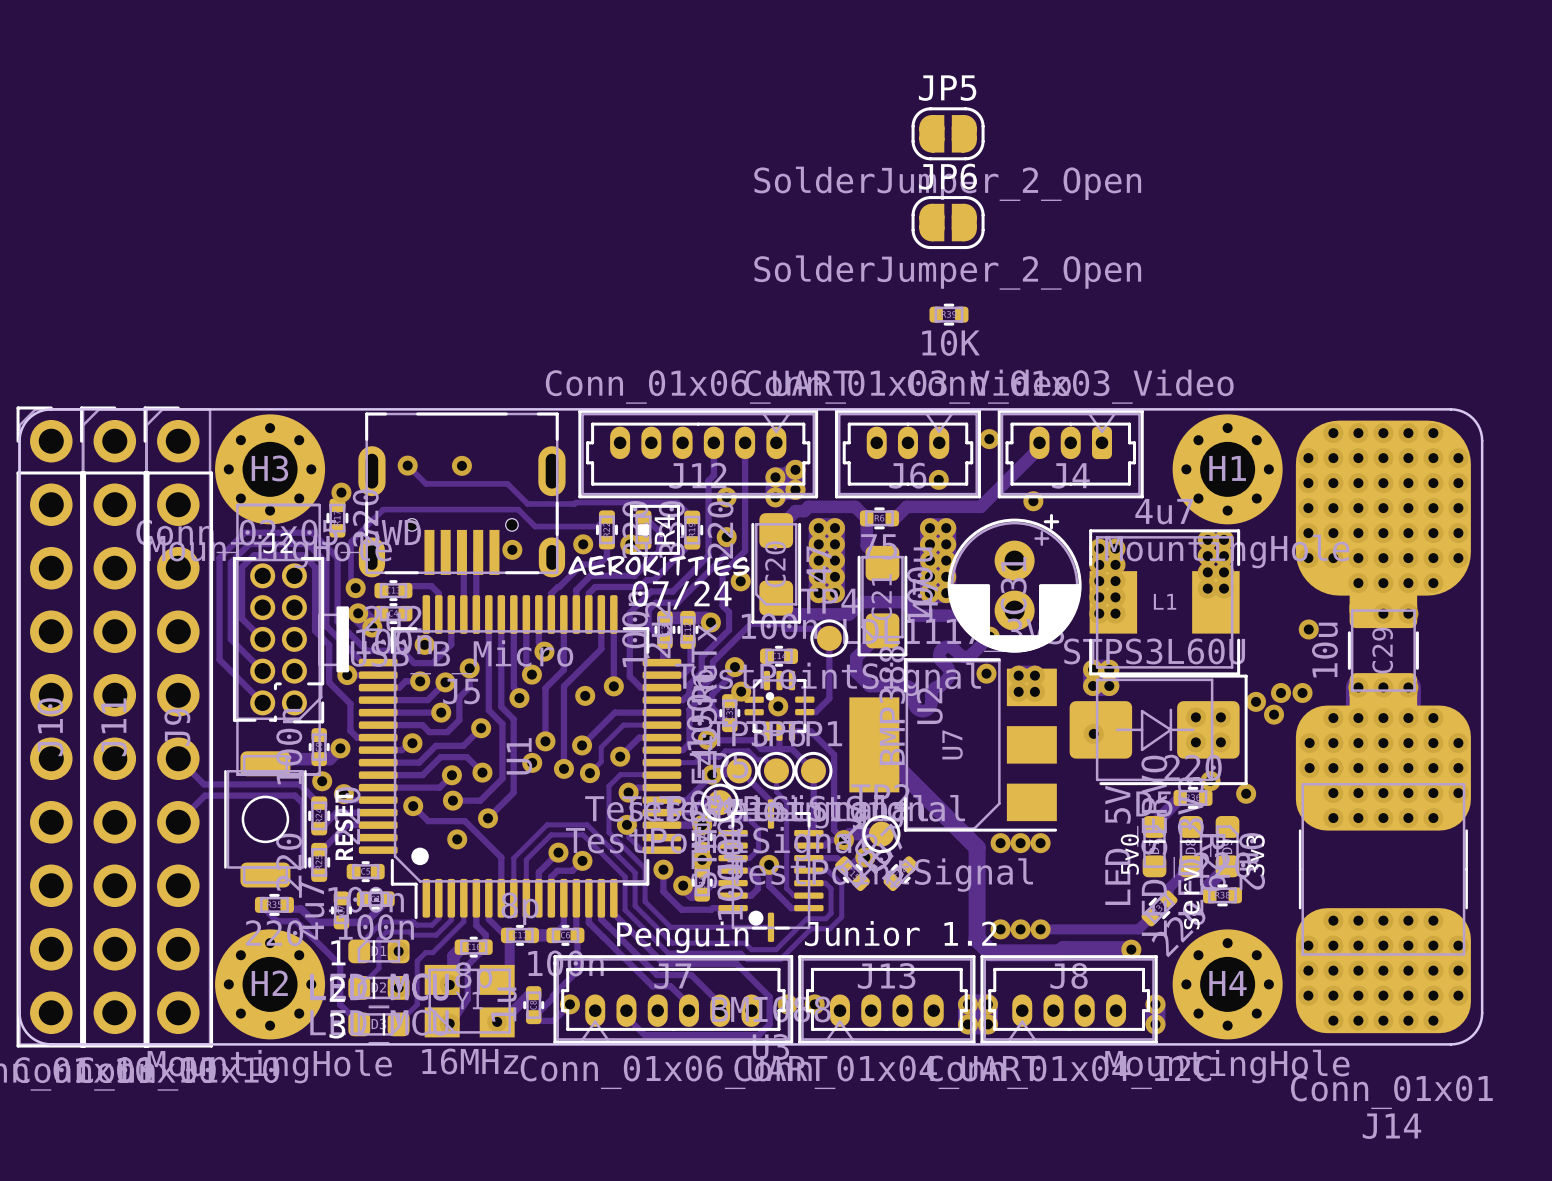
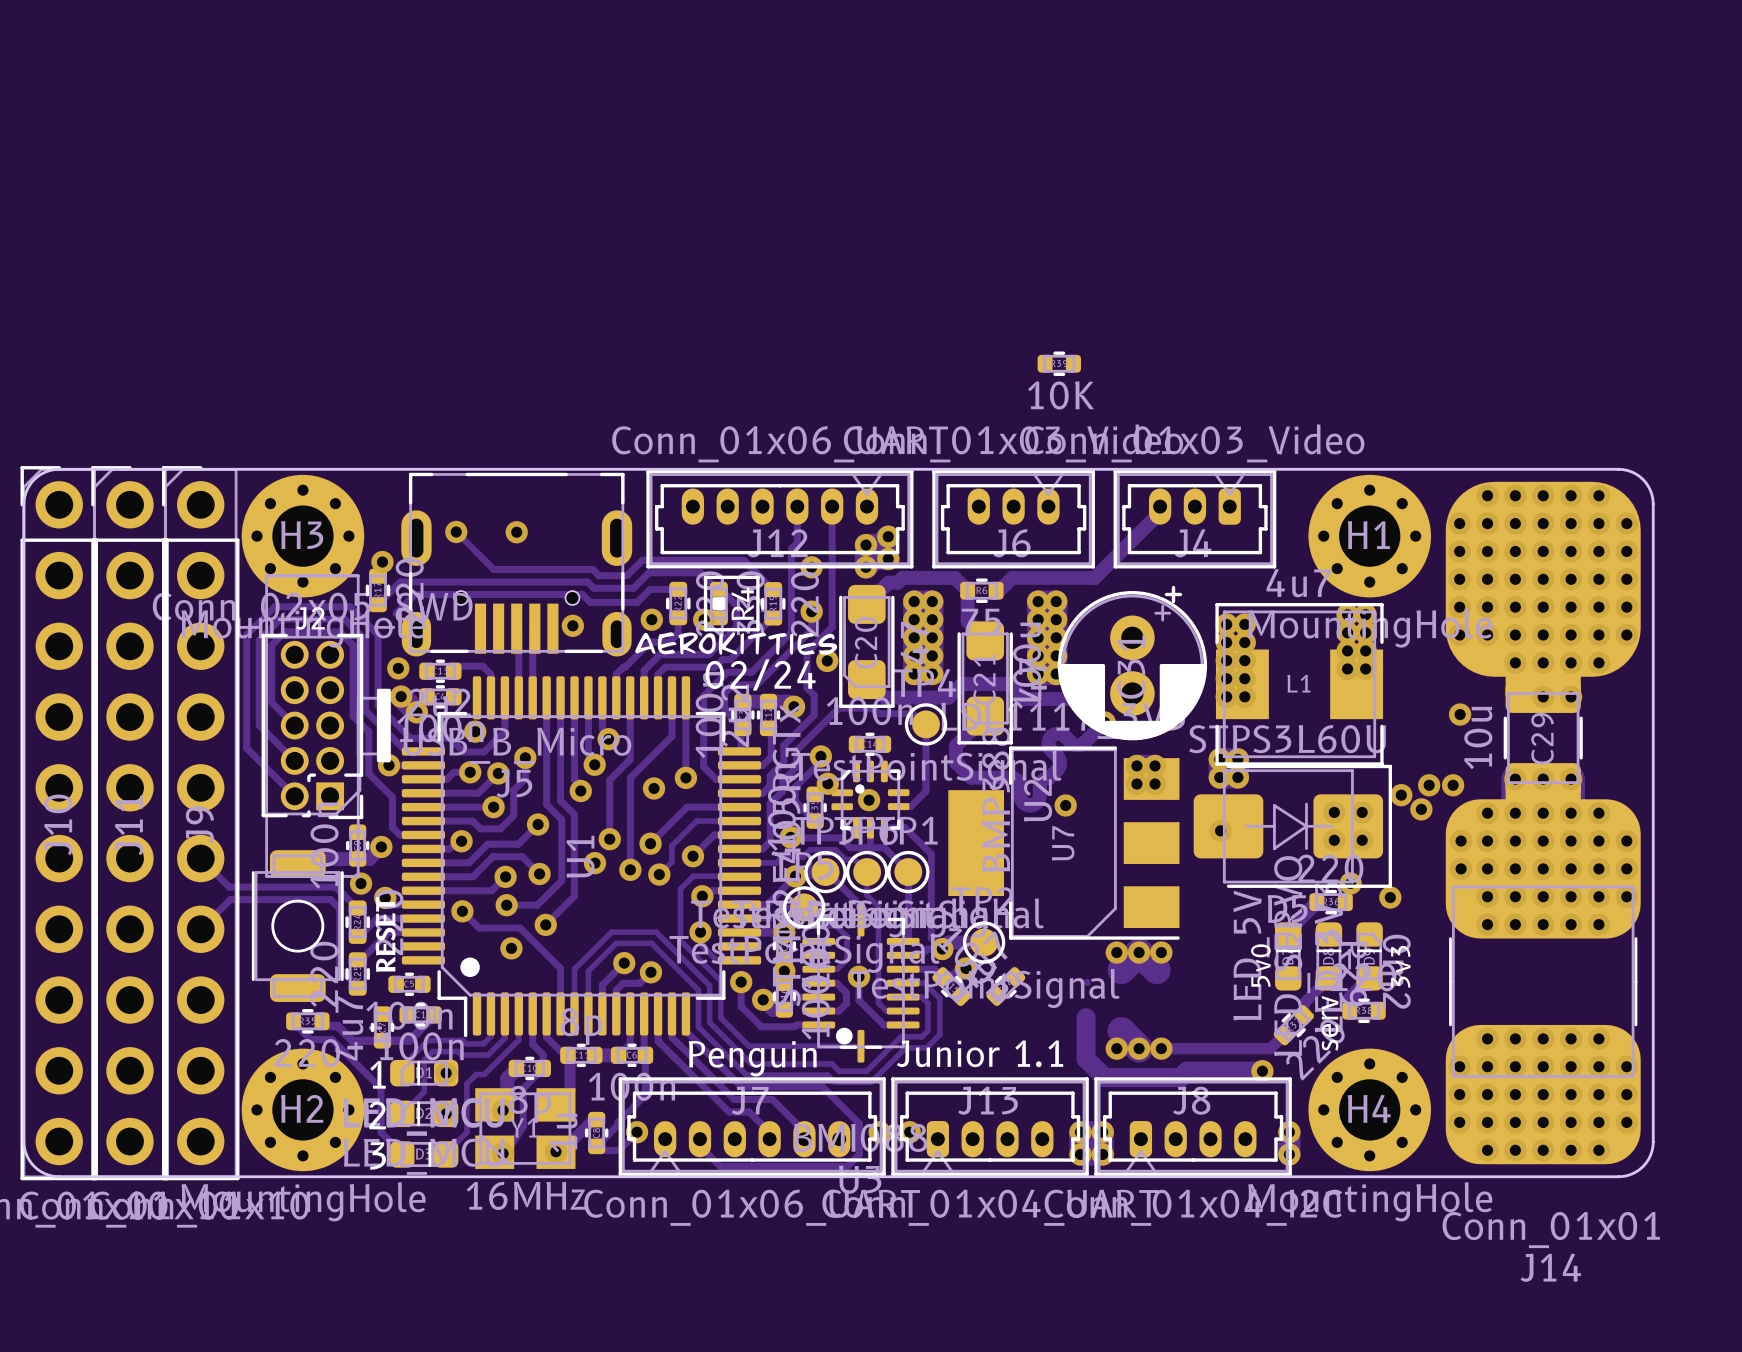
JP5: SolderJumper_2_Open (948, 133) -> none
JP6: SolderJumper_2_Open (948, 222) -> none
via: (989, 439) -> none
via: (938, 479) -> none
track: (425, 483) (507, 483) (527, 503) (677, 502) -> (476, 552) (493, 569) (592, 569) (599, 575) (627, 575) (642, 560) (743, 560) (756, 573)
via: (1033, 501) -> none
J2 footprint: [232, 503, 349, 777] -> [261, 574, 391, 878]
track: (606, 517) (597, 526) (535, 526) (518, 509) (383, 509) (351, 541) (351, 583) (355, 588) -> (678, 589) (650, 589) (637, 602) (590, 602) (582, 594) (414, 594) (395, 613)
track: none -> (718, 589) (700, 572) (648, 572) (633, 588) (593, 588) (587, 582) (400, 582) (376, 606)
text: 07/24 (681, 595) -> 02/24 (760, 674)
via position: (986, 673) -> (1065, 805)
track: (874, 744) (977, 847) (977, 939) (990, 952) (1060, 952) -> (1086, 1017) (1086, 1058) (1104, 1077) (1180, 1077) (1183, 1074)
track: none -> (1121, 970) (1139, 952) (1156, 970)
track: none -> (1121, 1030) (1139, 1048)
text: Junior 1.2 (900, 933) -> Junior 1.1 (980, 1053)
J13 footprint: [798, 955, 976, 1044] -> [891, 1077, 1089, 1176]
J8 footprint: [980, 955, 1158, 1044] -> [1094, 1077, 1292, 1176]

